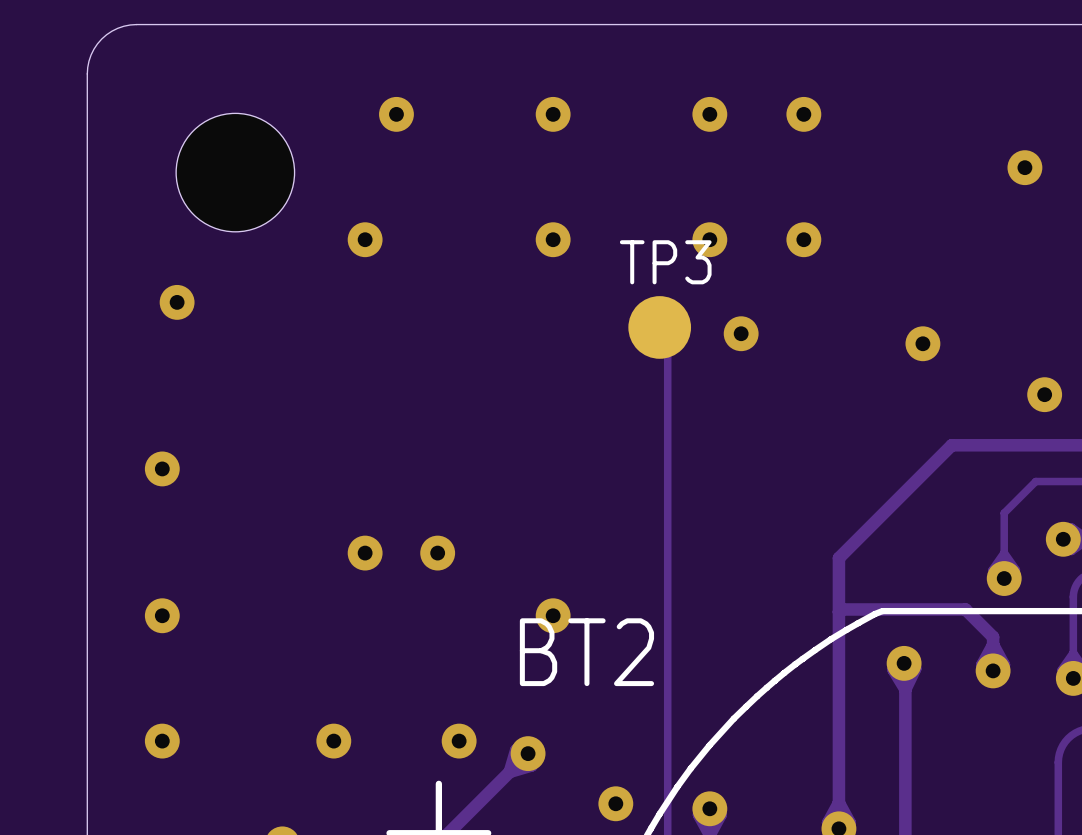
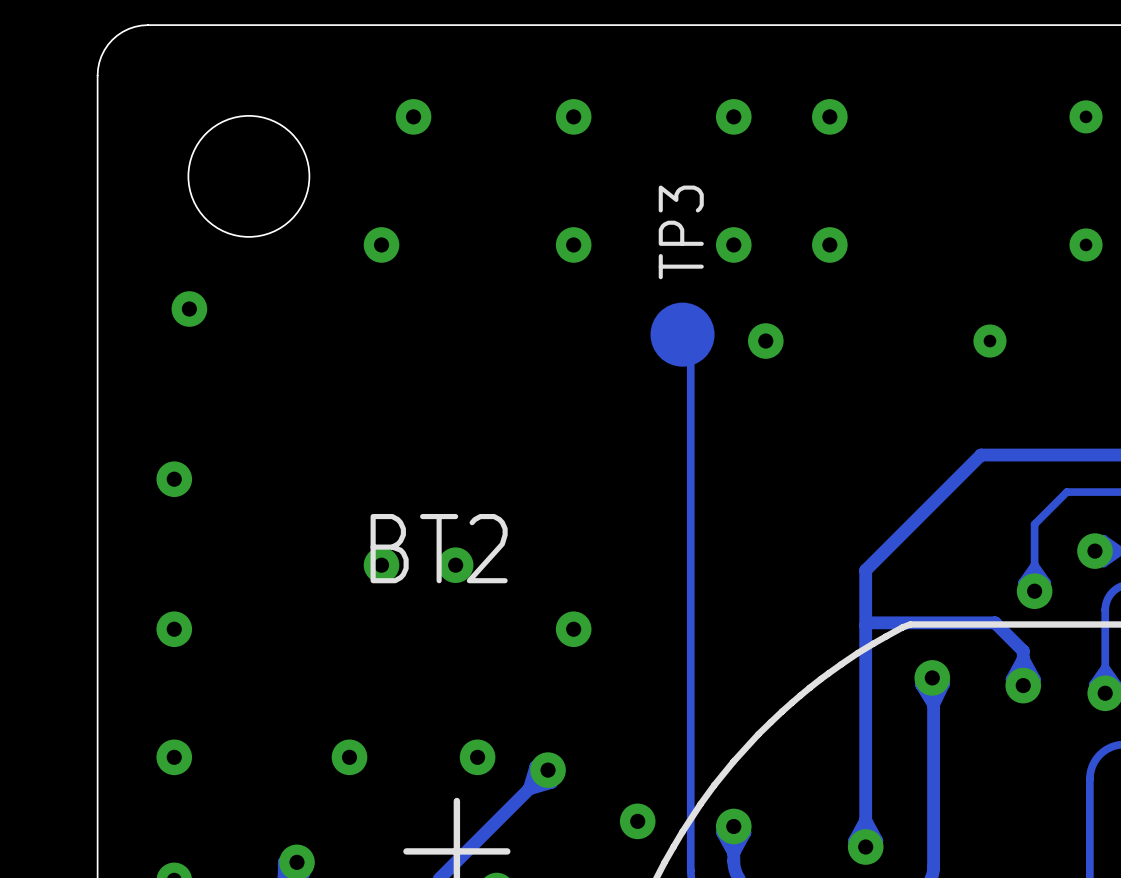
via: none -> (1086, 116)
via: (1024, 167) -> none
via: none -> (1086, 244)
TP3 name rotation: 0° (665, 262) -> 90° counterclockwise (681, 232)
via: none -> (989, 341)
via: (922, 343) -> none
via: (1044, 394) -> none
BT2 name position: BT2 (586, 652) -> BT2 (439, 548)

